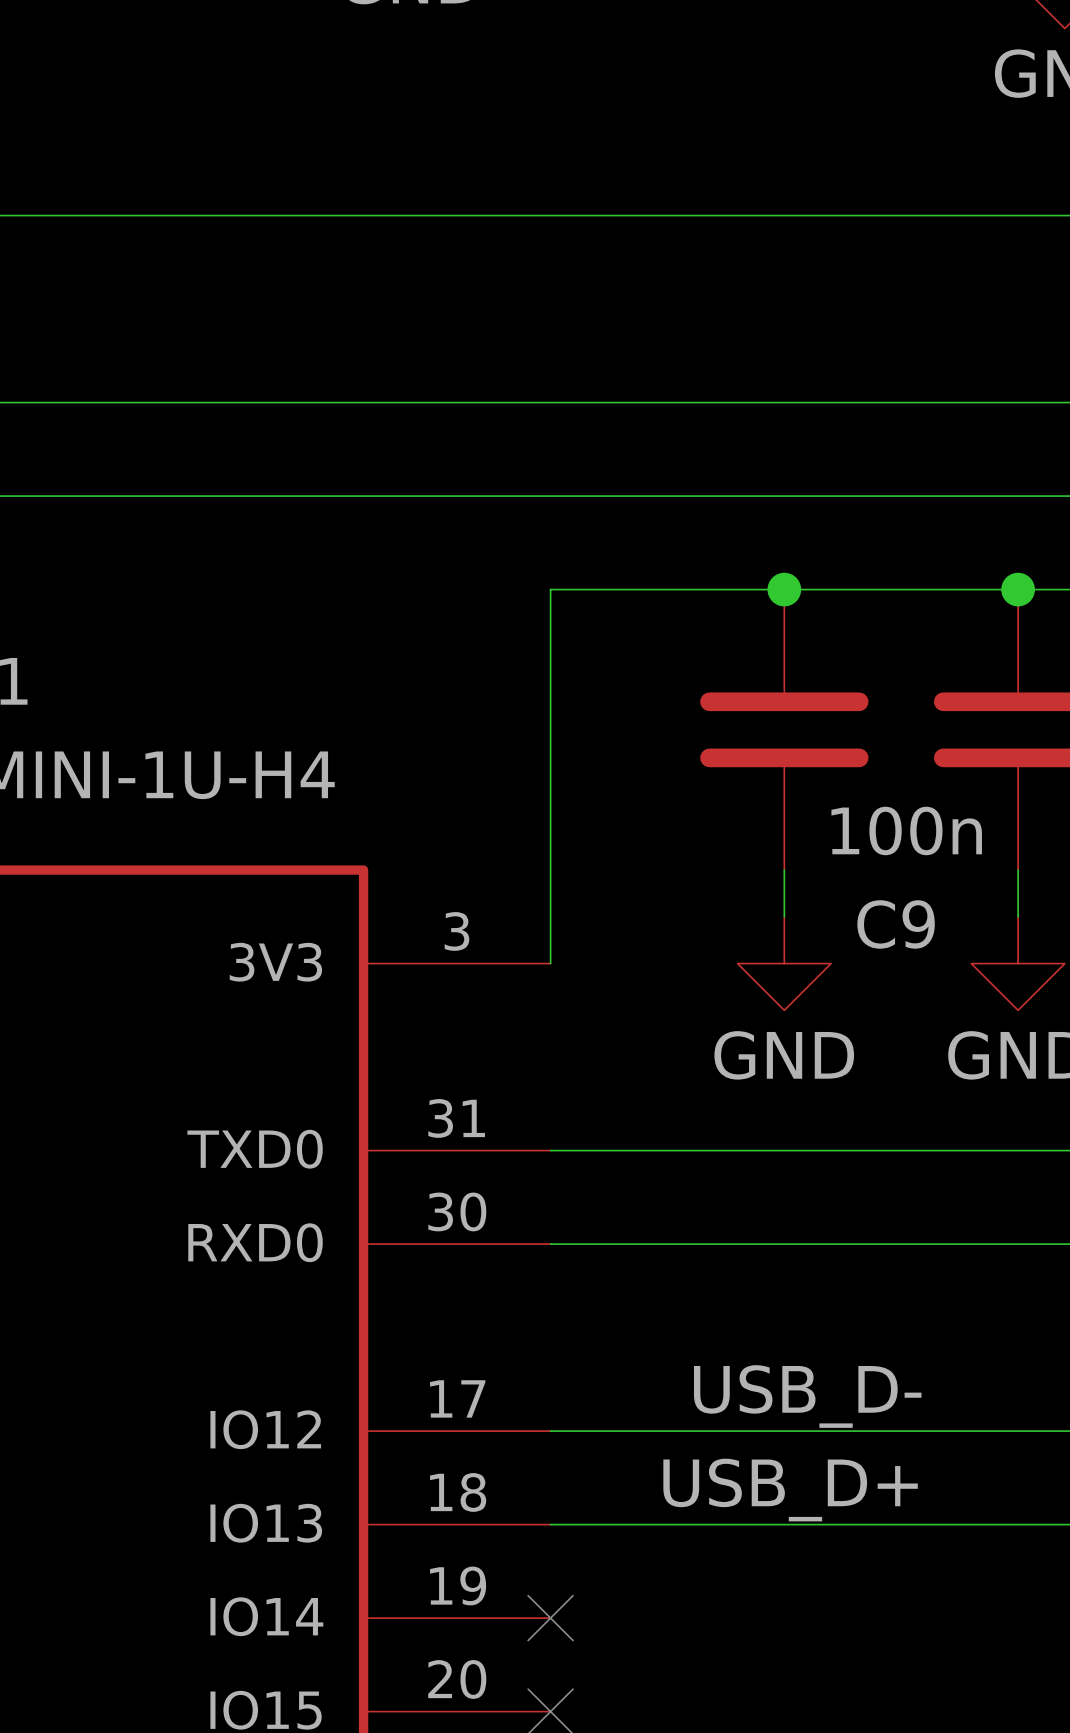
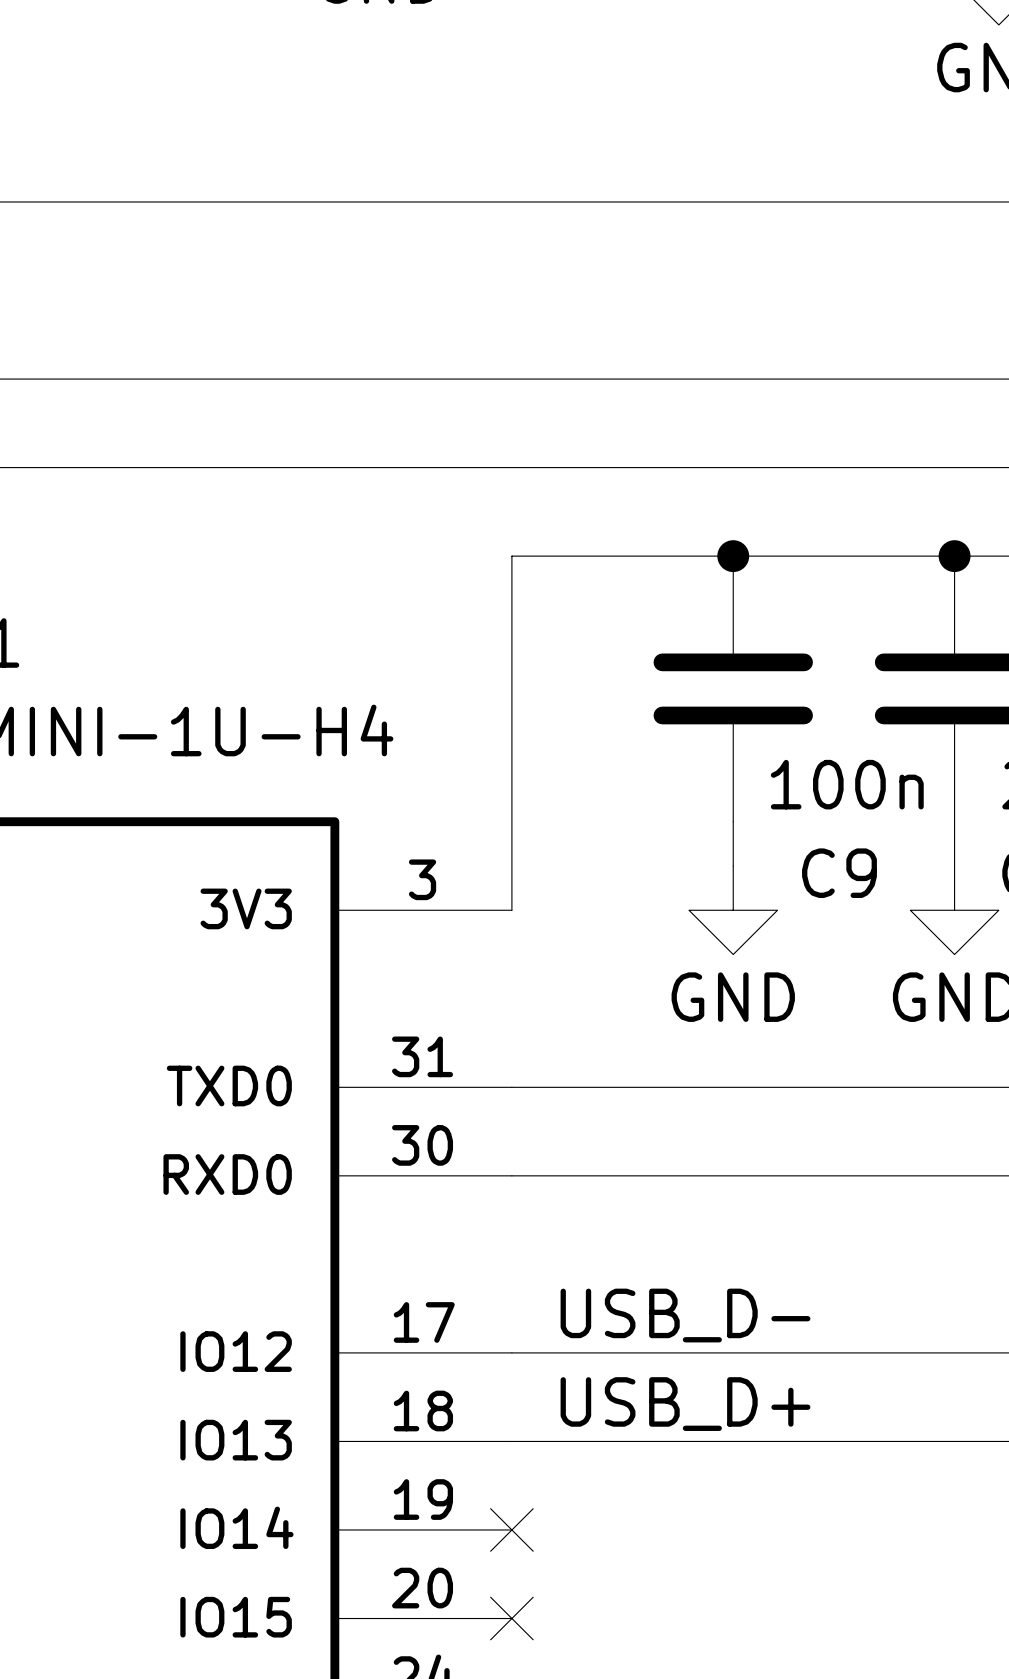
label position: USB_D- (807, 1396) -> USB_D- (685, 1315)
label position: USB_D+ (790, 1490) -> USB_D+ (685, 1404)

